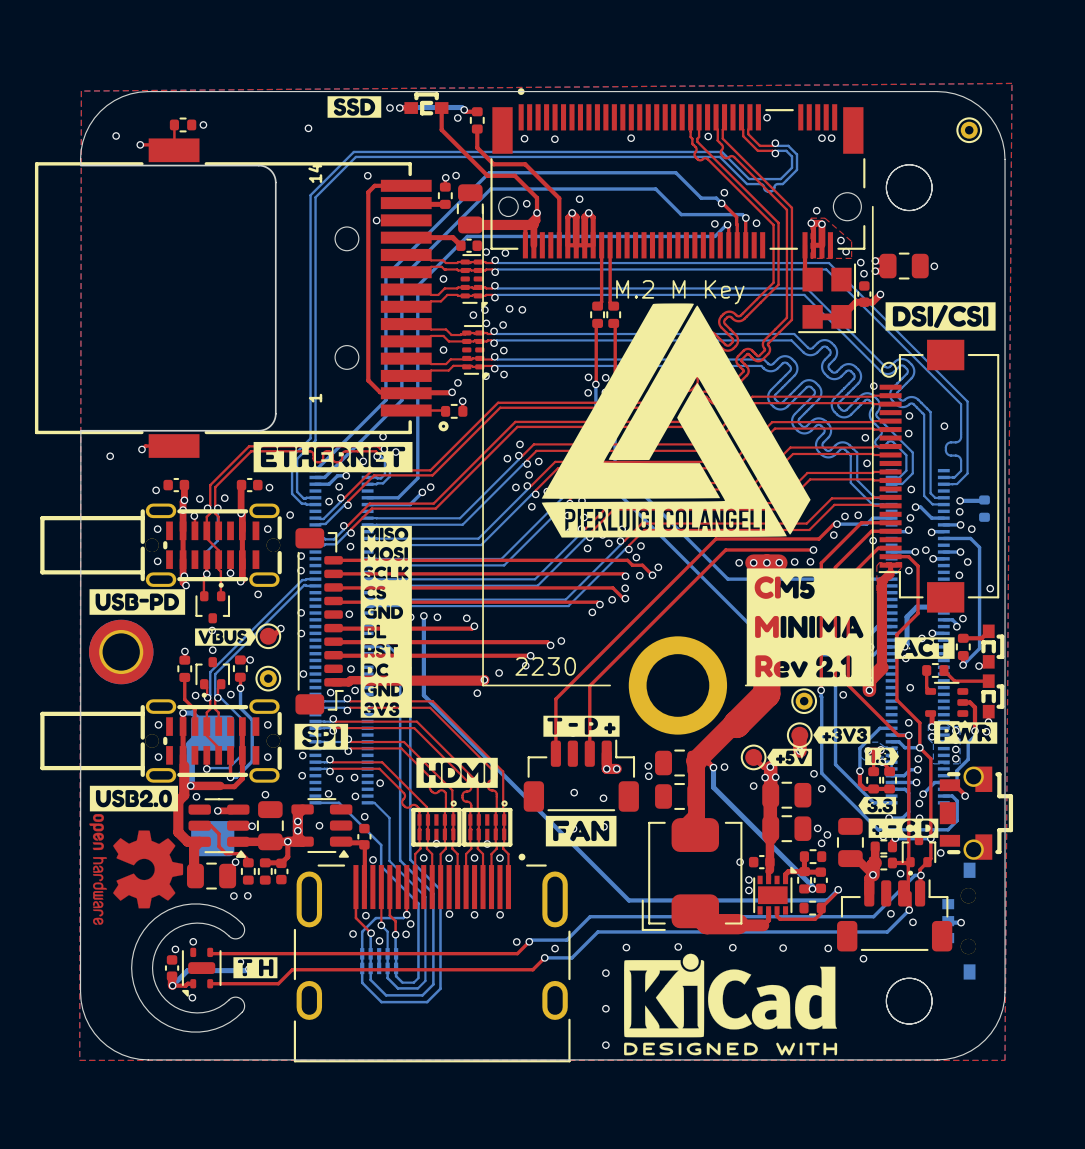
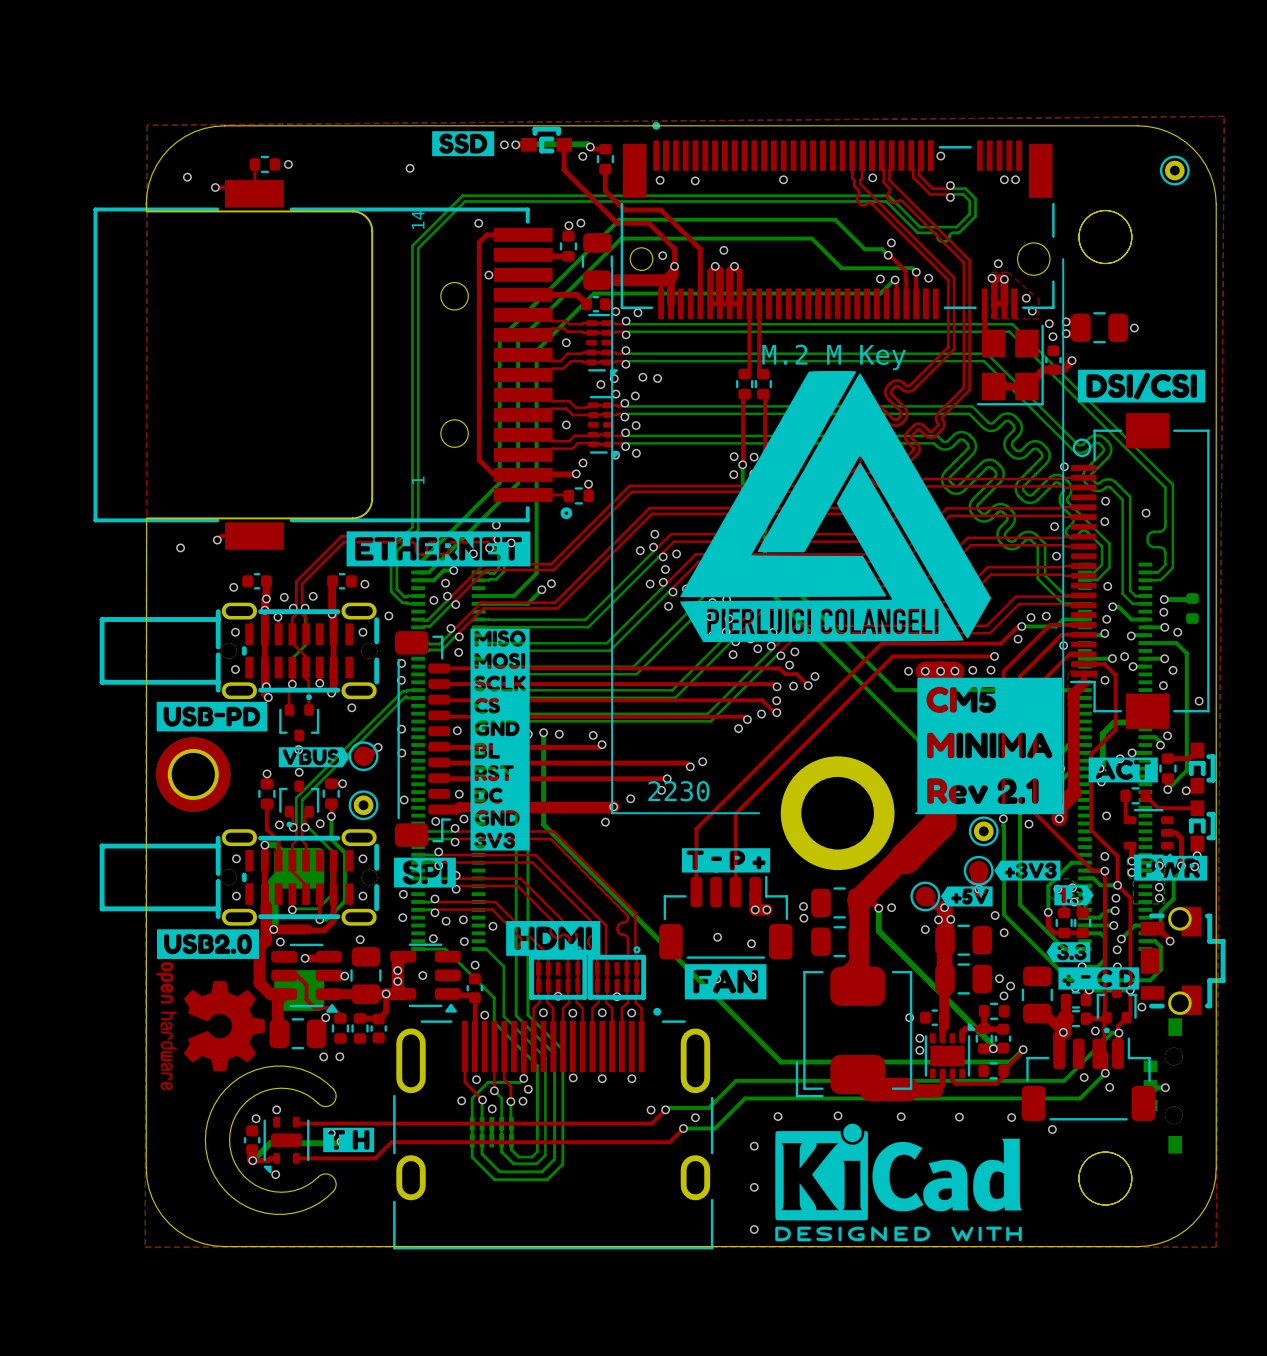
drawing position: (457, 772) -> (553, 938)

